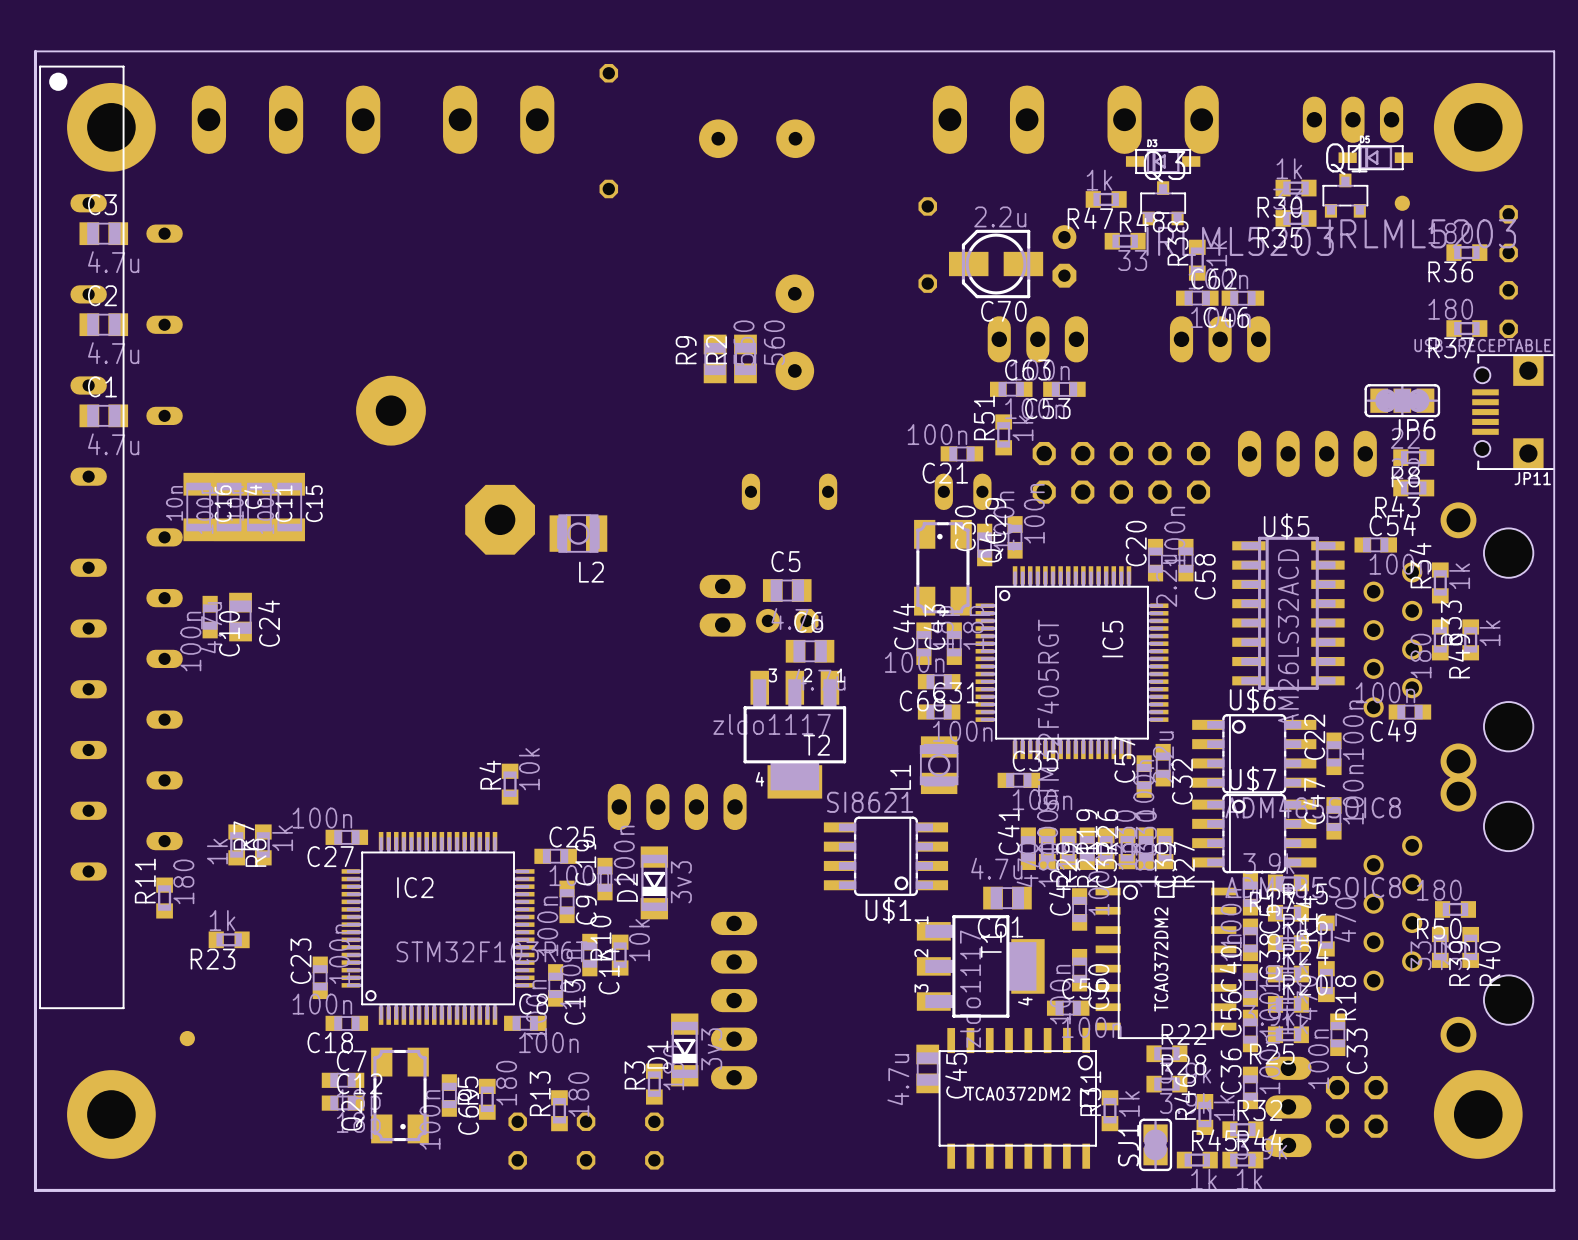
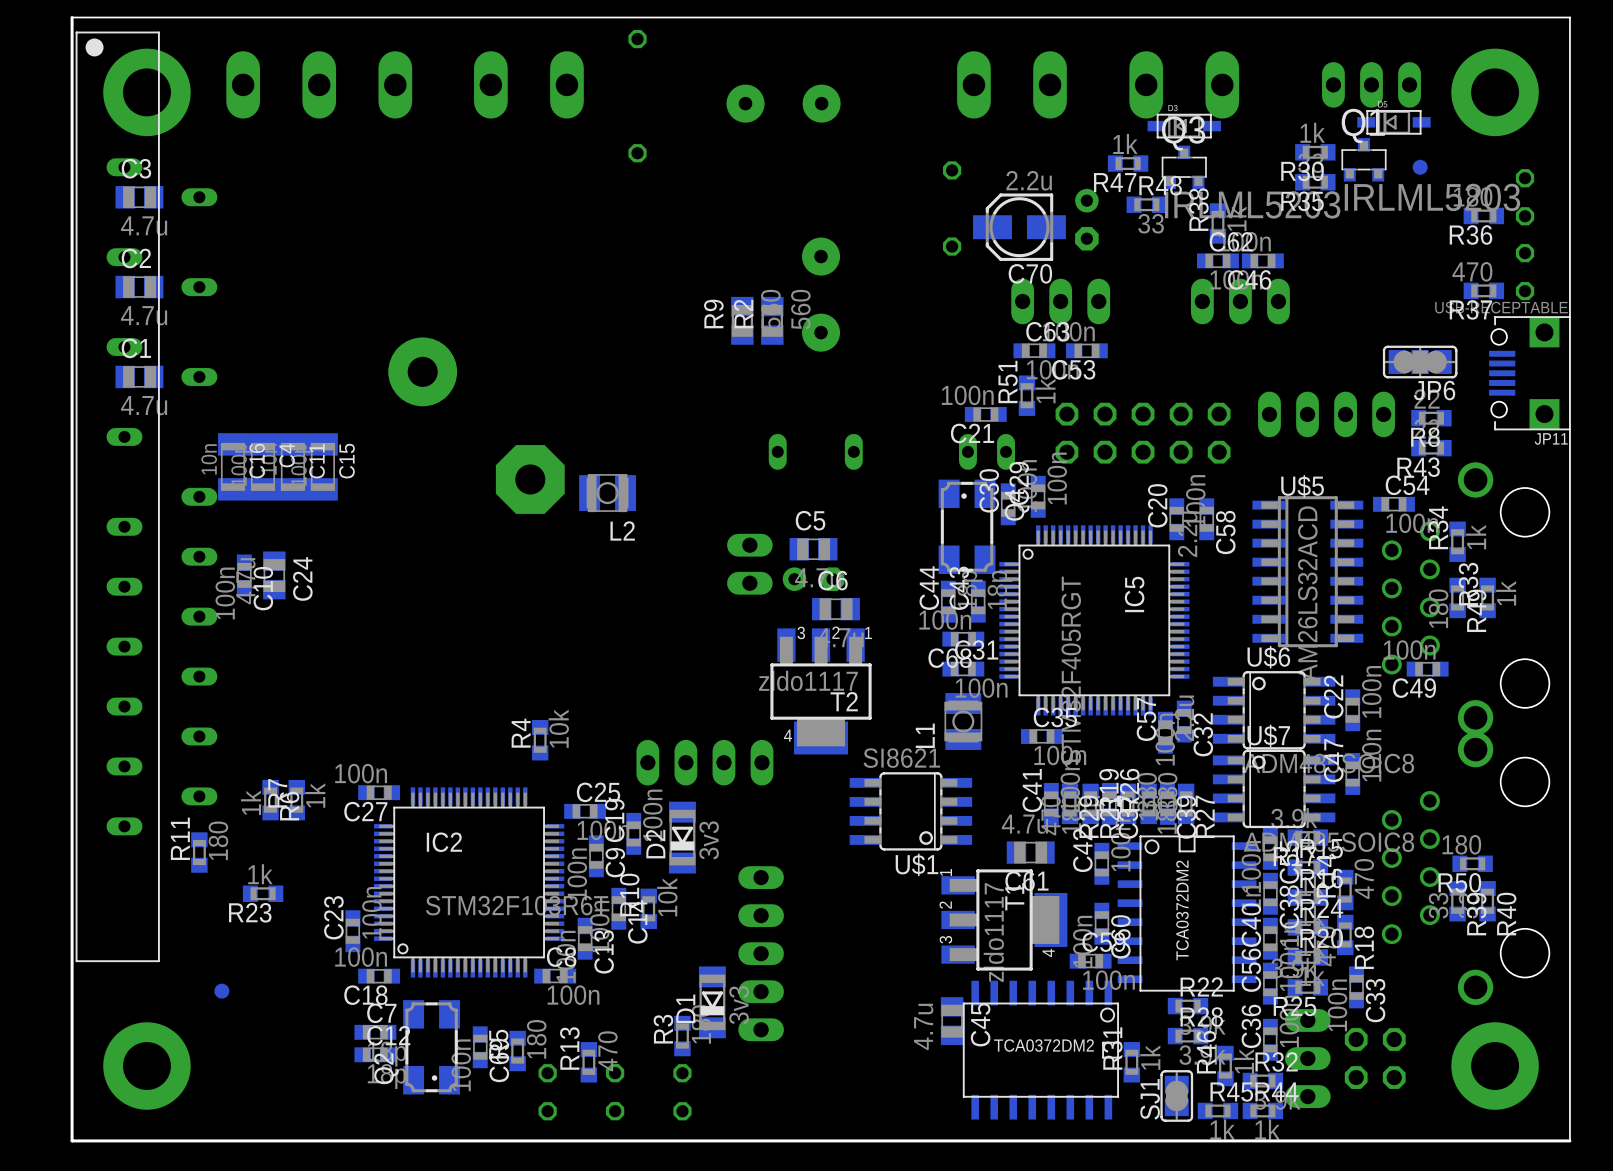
R37 value: 180 (1450, 309) -> 470 (1472, 271)
R13 value: 180 (578, 1094) -> 470 (607, 1051)

